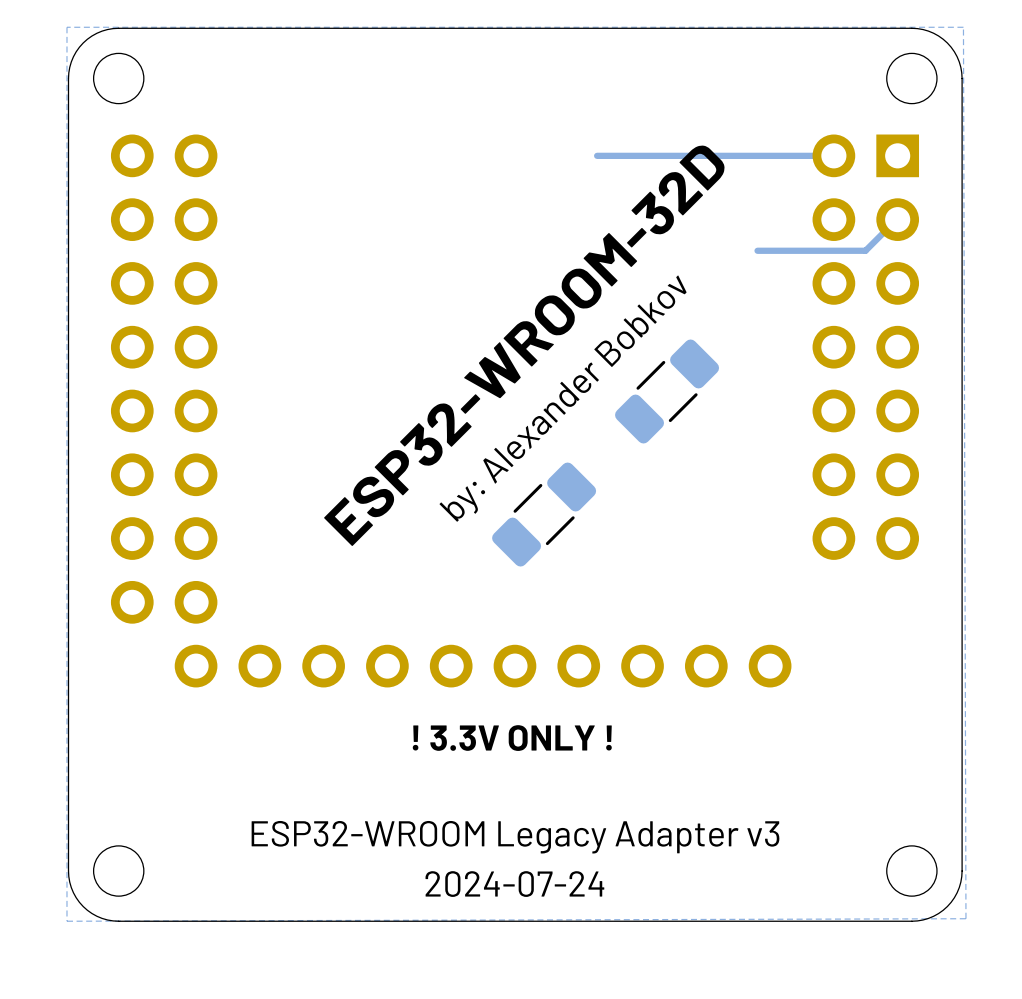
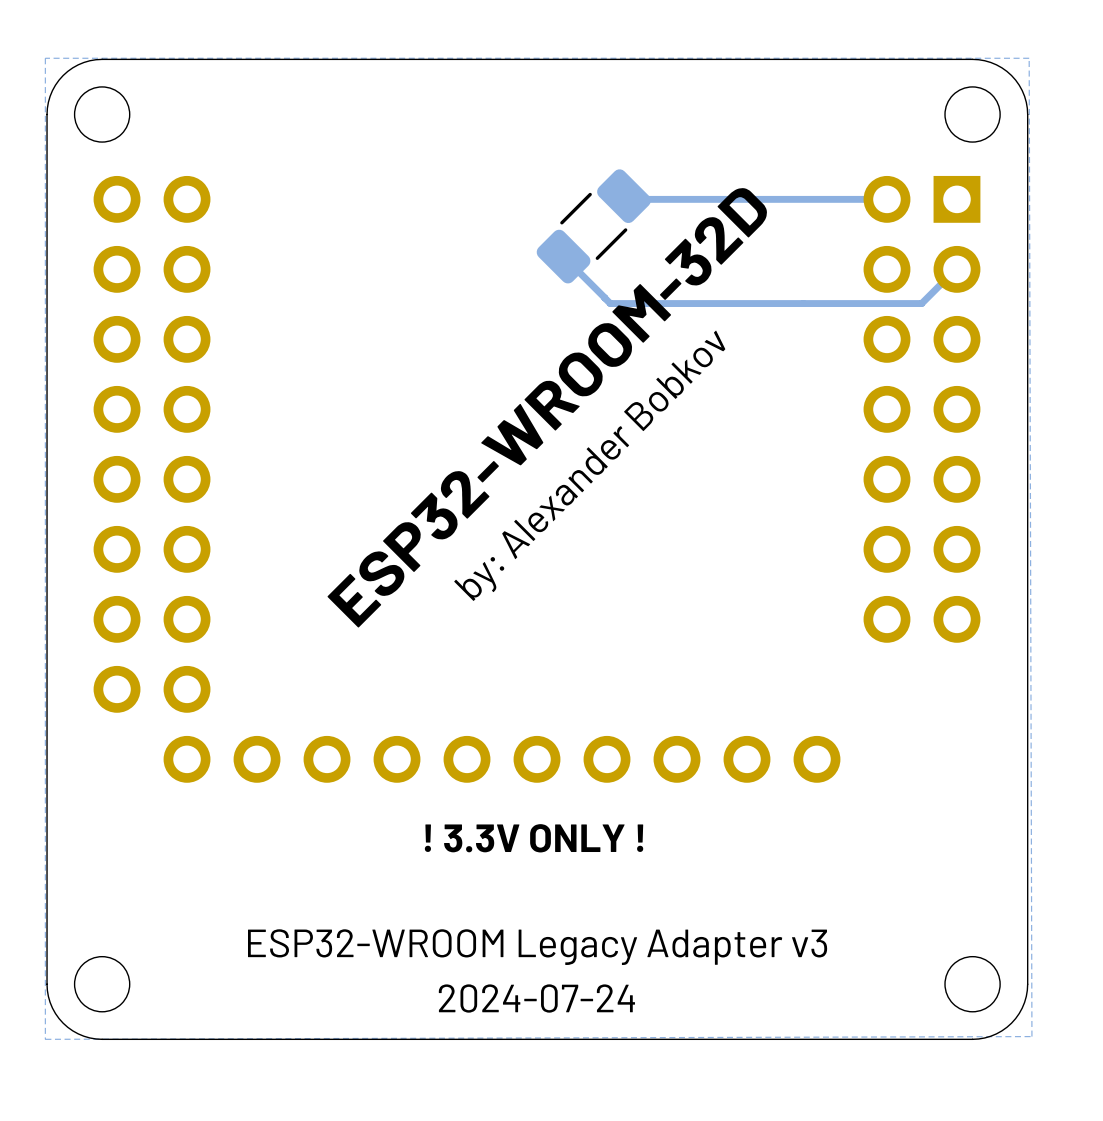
part: none -> (593, 226)
track: none -> (563, 256) (610, 303) (803, 303)
part: (667, 391) -> none
part: (544, 514) -> none

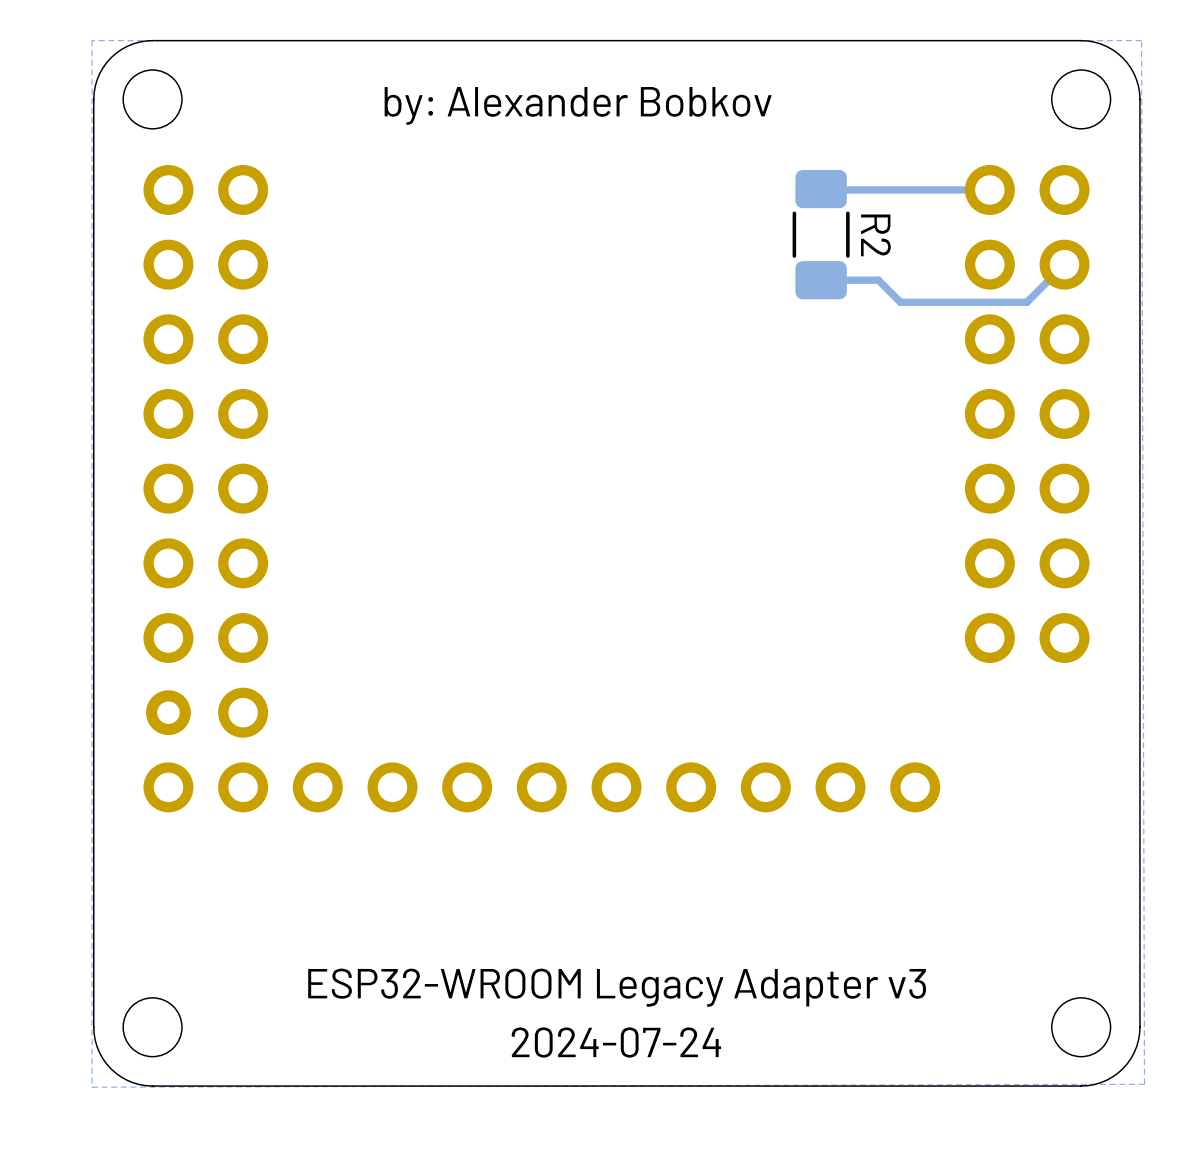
part footprint: [46, 58, 1029, 1041] -> [93, 39, 1141, 1087]
track: (886, 199) (627, 199) -> (989, 189) (821, 189)
part: (593, 226) -> none
R2: none -> (821, 234)
track: (563, 256) (610, 303) (803, 303) -> (821, 280) (878, 280) (900, 302)

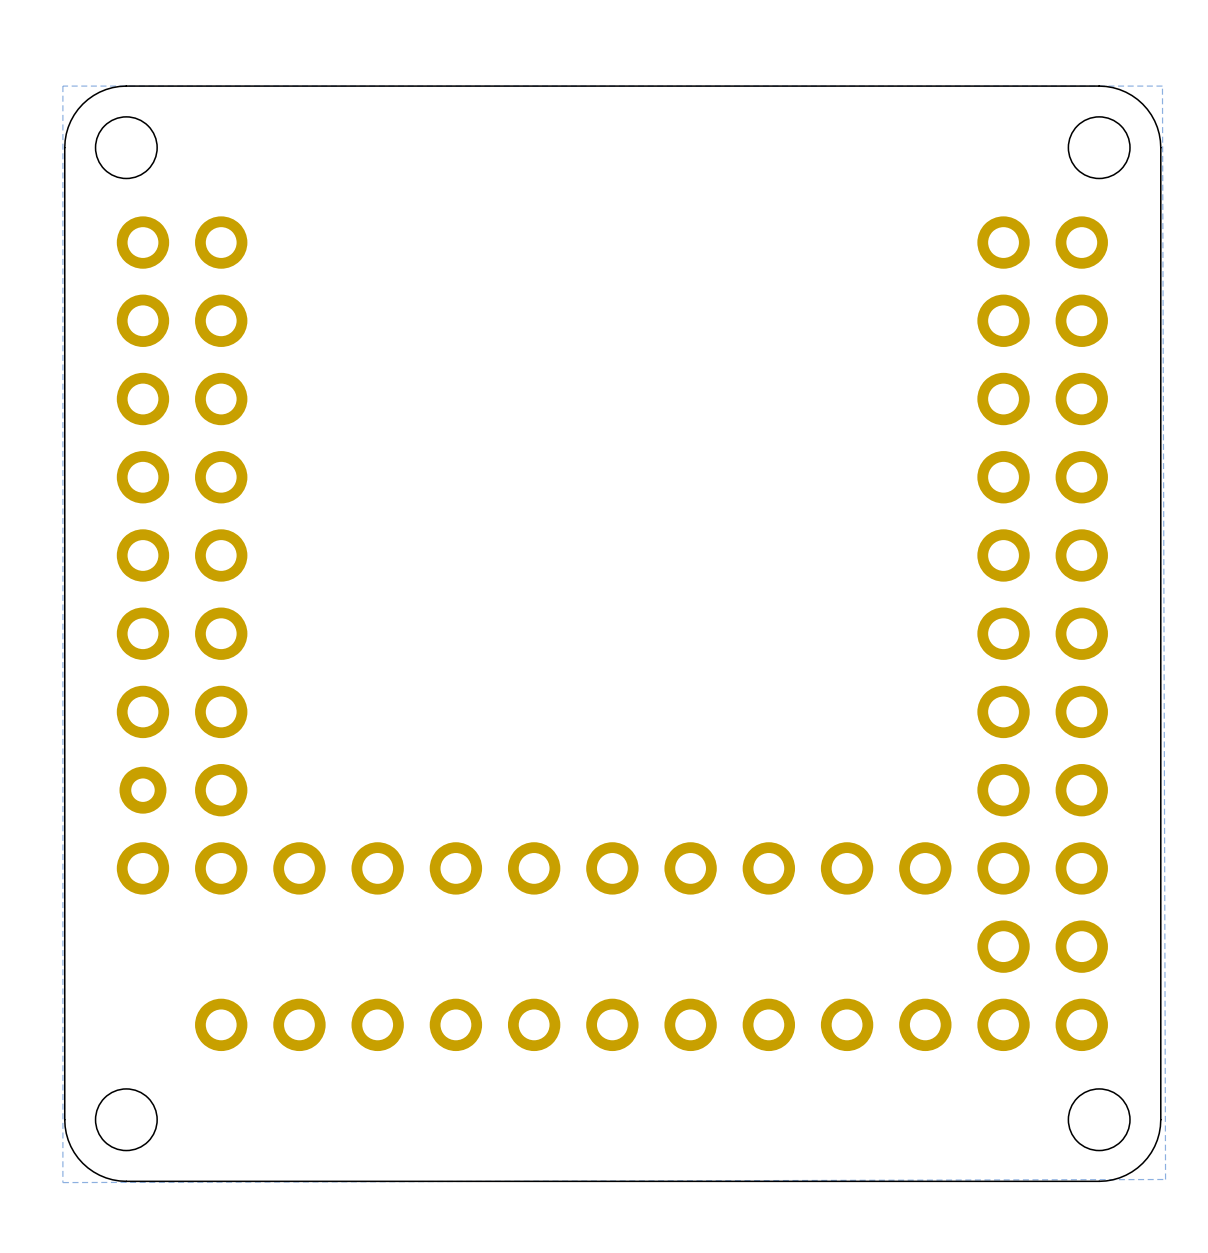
part footprint: [93, 39, 1141, 1087] -> [63, 85, 1162, 1183]
track: (821, 189) (989, 189) -> none
R2: (821, 234) -> none
track: (1064, 264) (1026, 302) (900, 302) (878, 280) (821, 280) -> none

